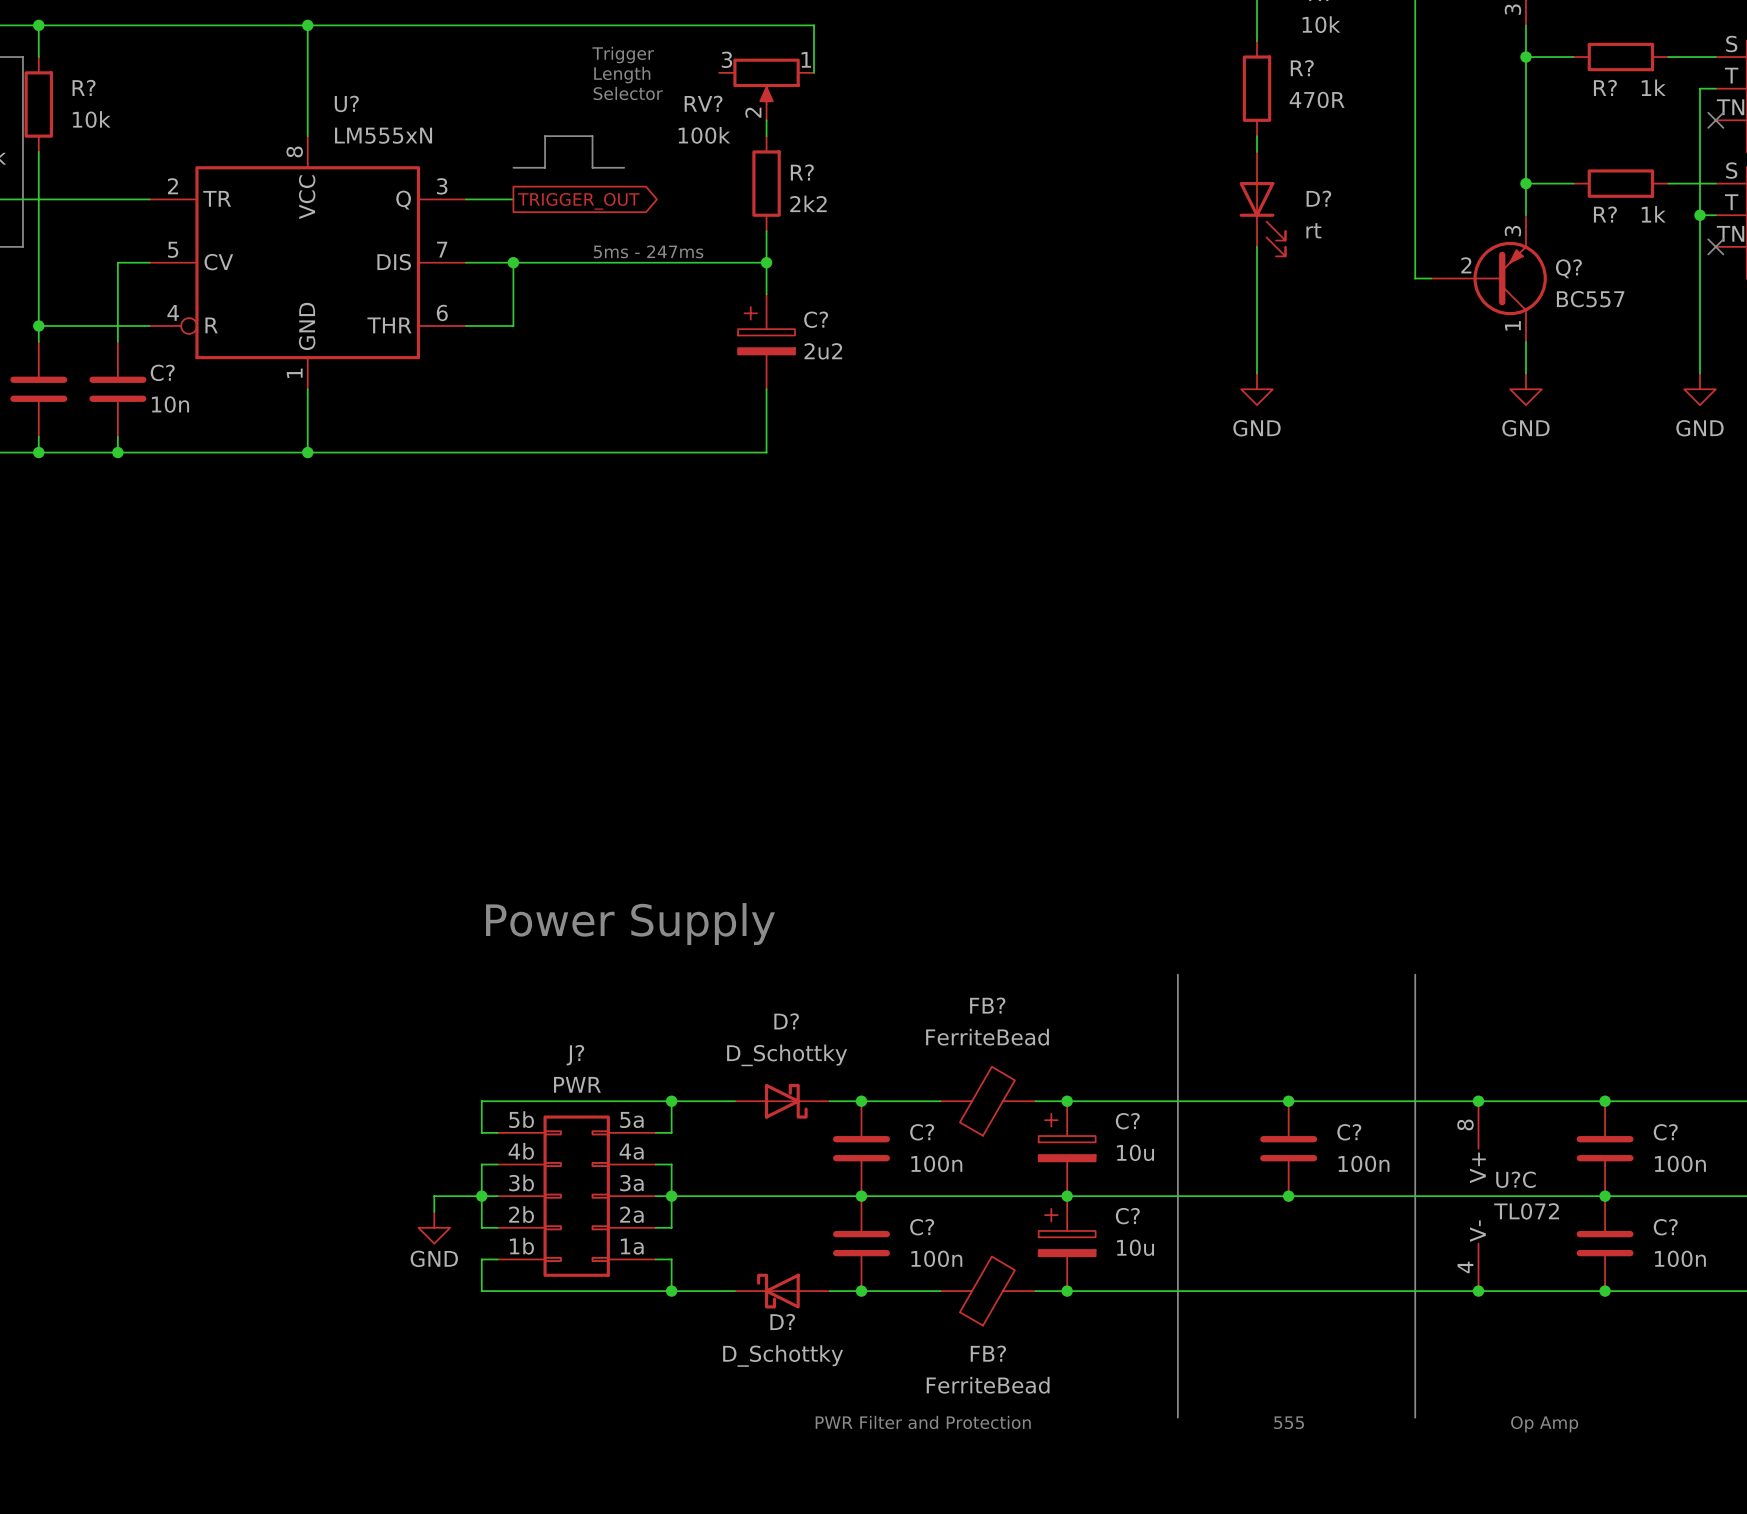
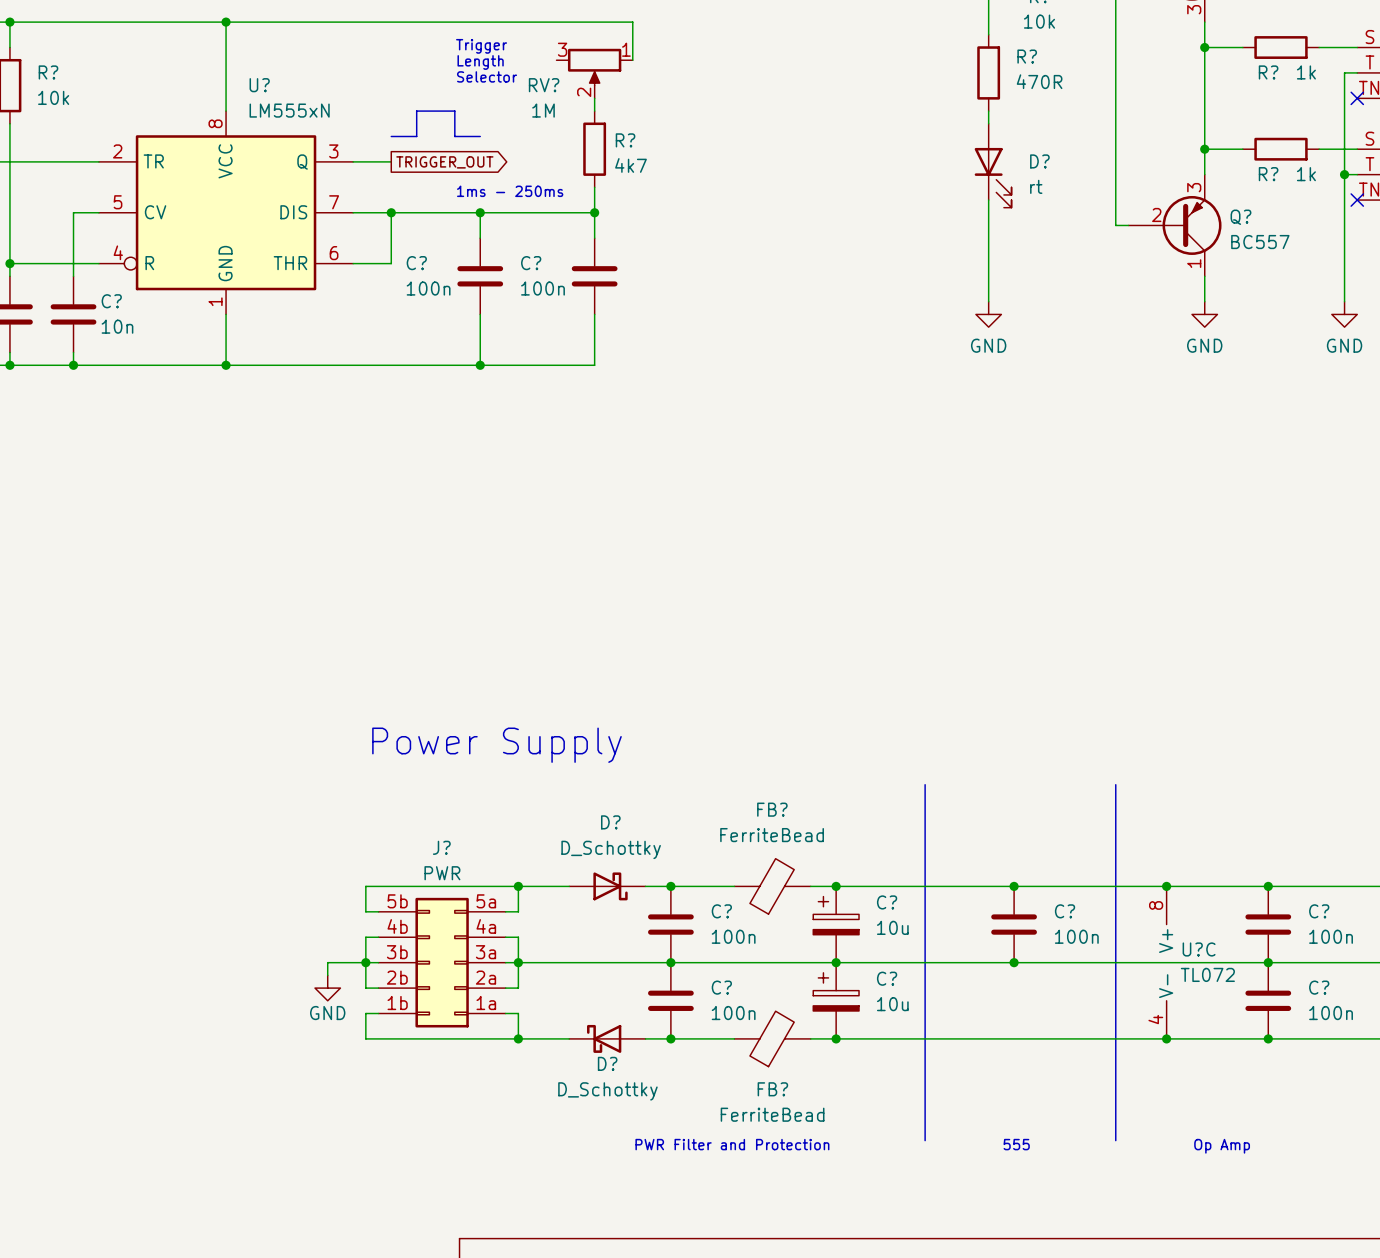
RV? value: 100k (704, 135) -> 1M (543, 110)
R? value: 2k2 (808, 203) -> 4k7 (630, 165)
text: 5ms - 247ms (648, 251) -> 1ms - 250ms (510, 191)
wire: none -> (480, 212) (480, 238)
junction: none -> (480, 212)
C? symbol: [738, 294, 796, 390] -> [571, 238, 618, 315]
C? name position: C? (816, 319) -> C? (531, 263)
C?: none -> 100n (480, 276)
C? value: 2u2 (823, 351) -> 100n (542, 288)
wire: none -> (480, 314) (480, 365)
junction: none -> (480, 365)

